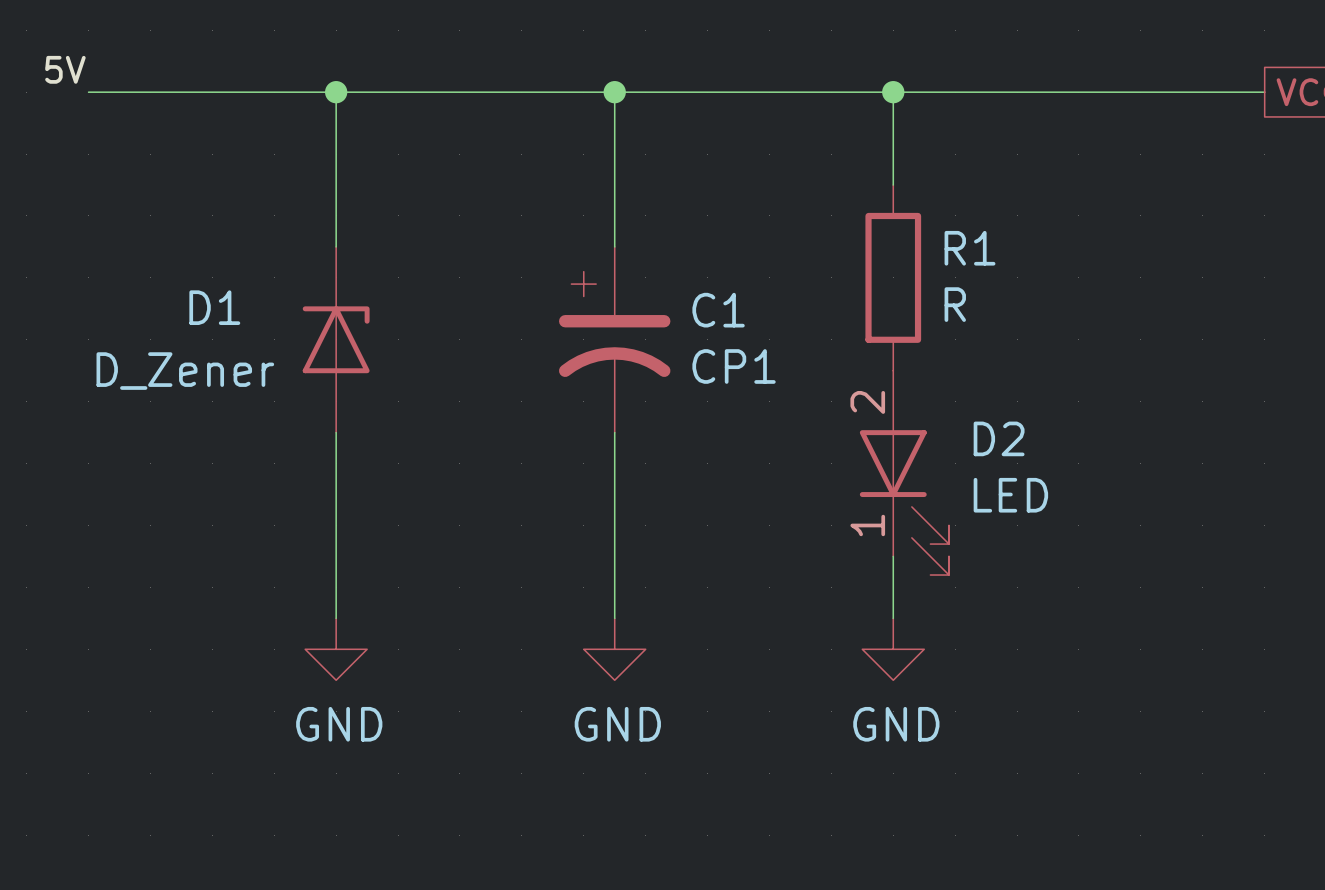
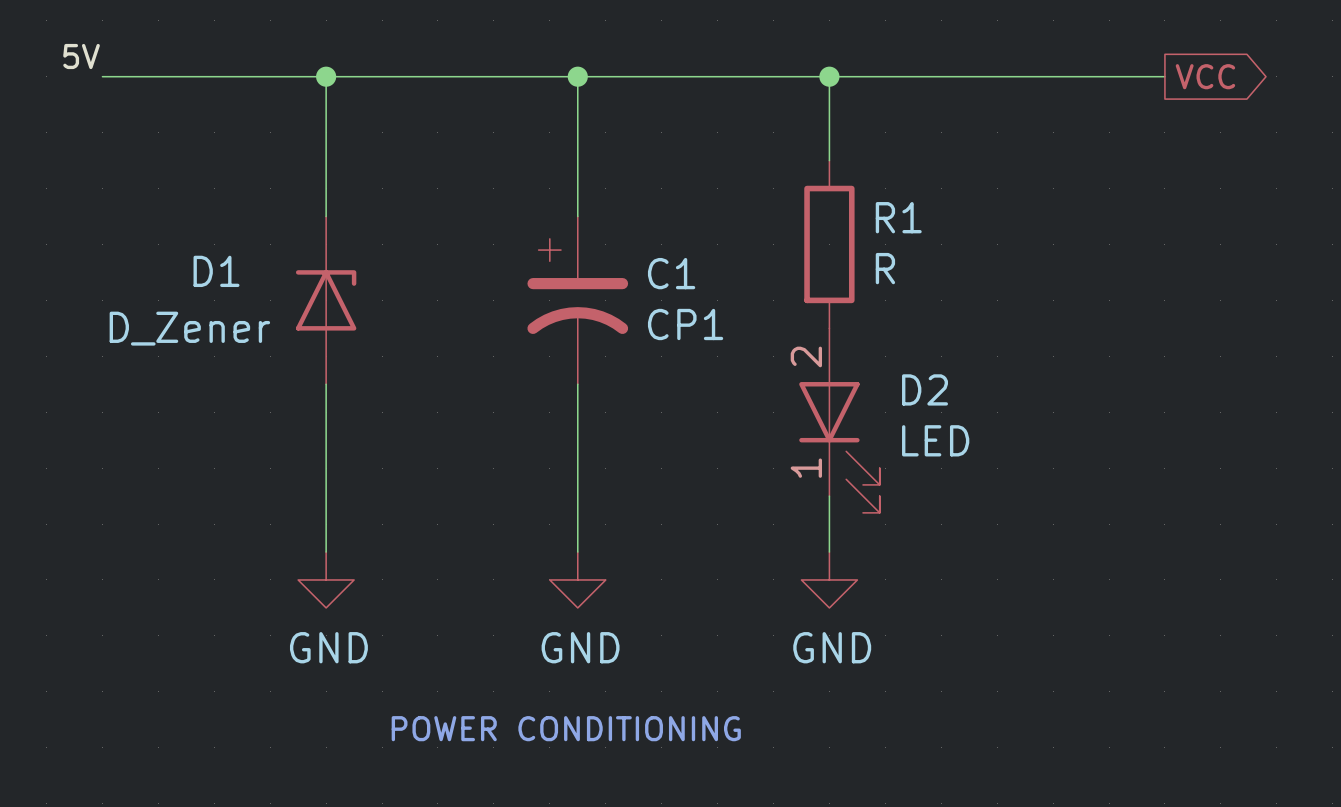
text: none -> POWER CONDITIONING (566, 728)

